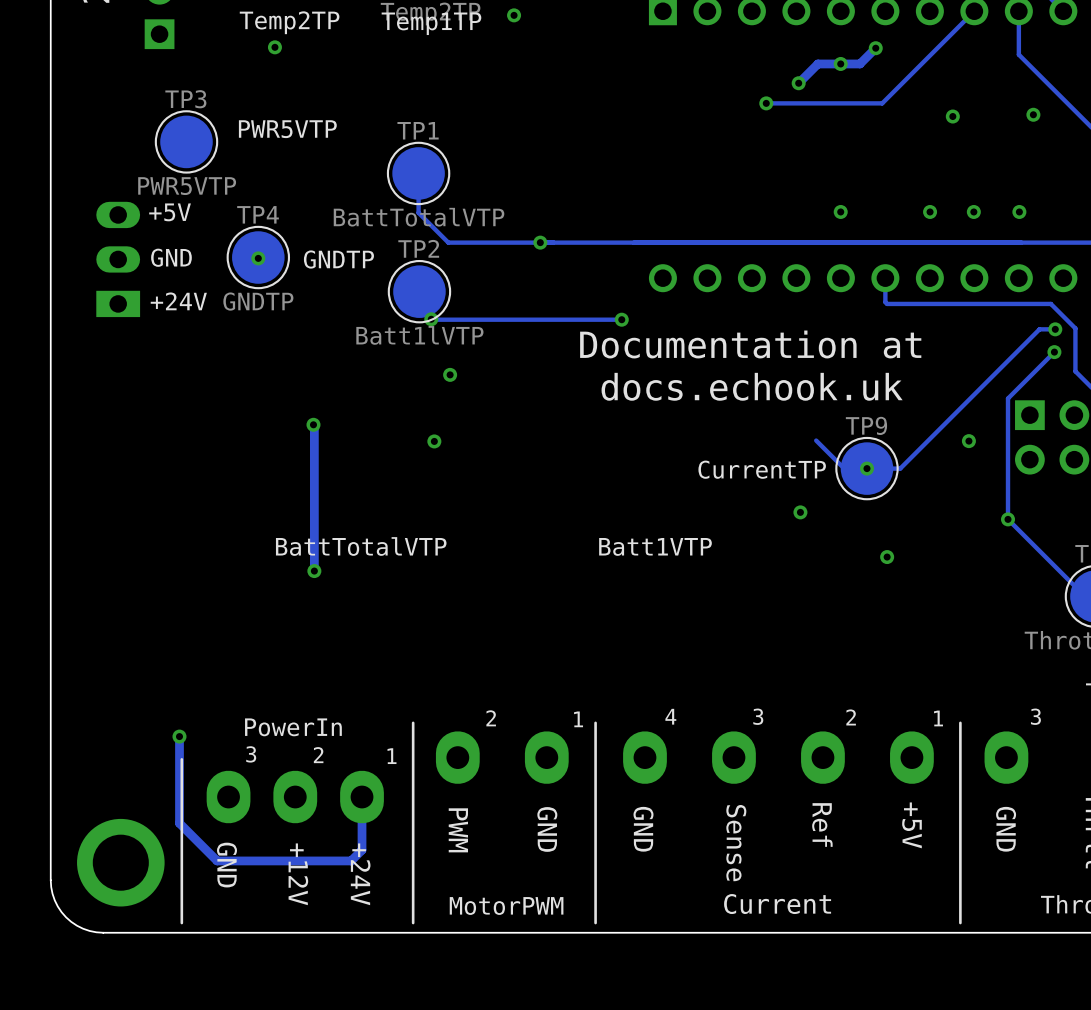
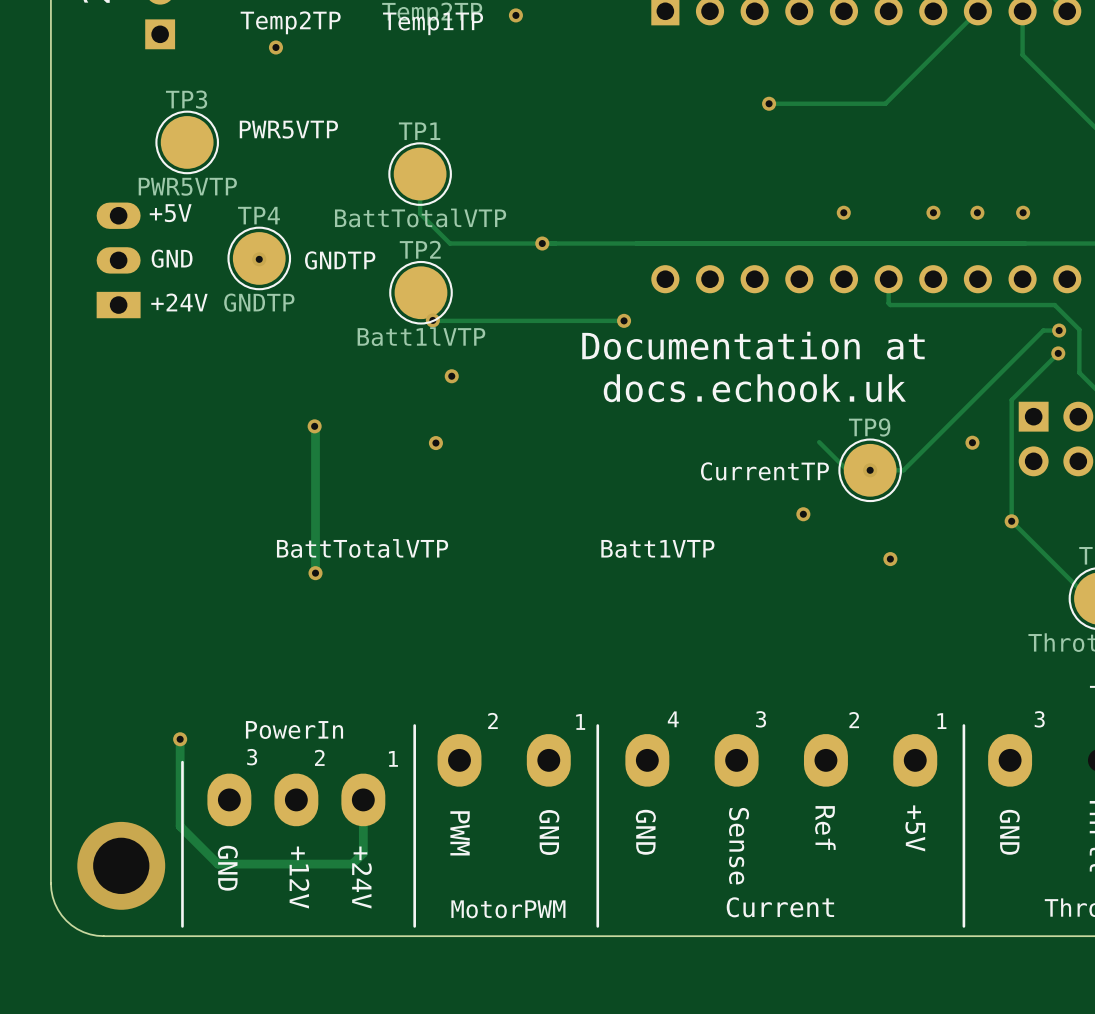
track: (875, 48) (859, 63) (817, 63) (798, 83) (796, 80) -> none
via: (875, 48) -> none
via: (840, 63) -> none
via: (798, 83) -> none
via: (1033, 114) -> none
via: (952, 116) -> none

